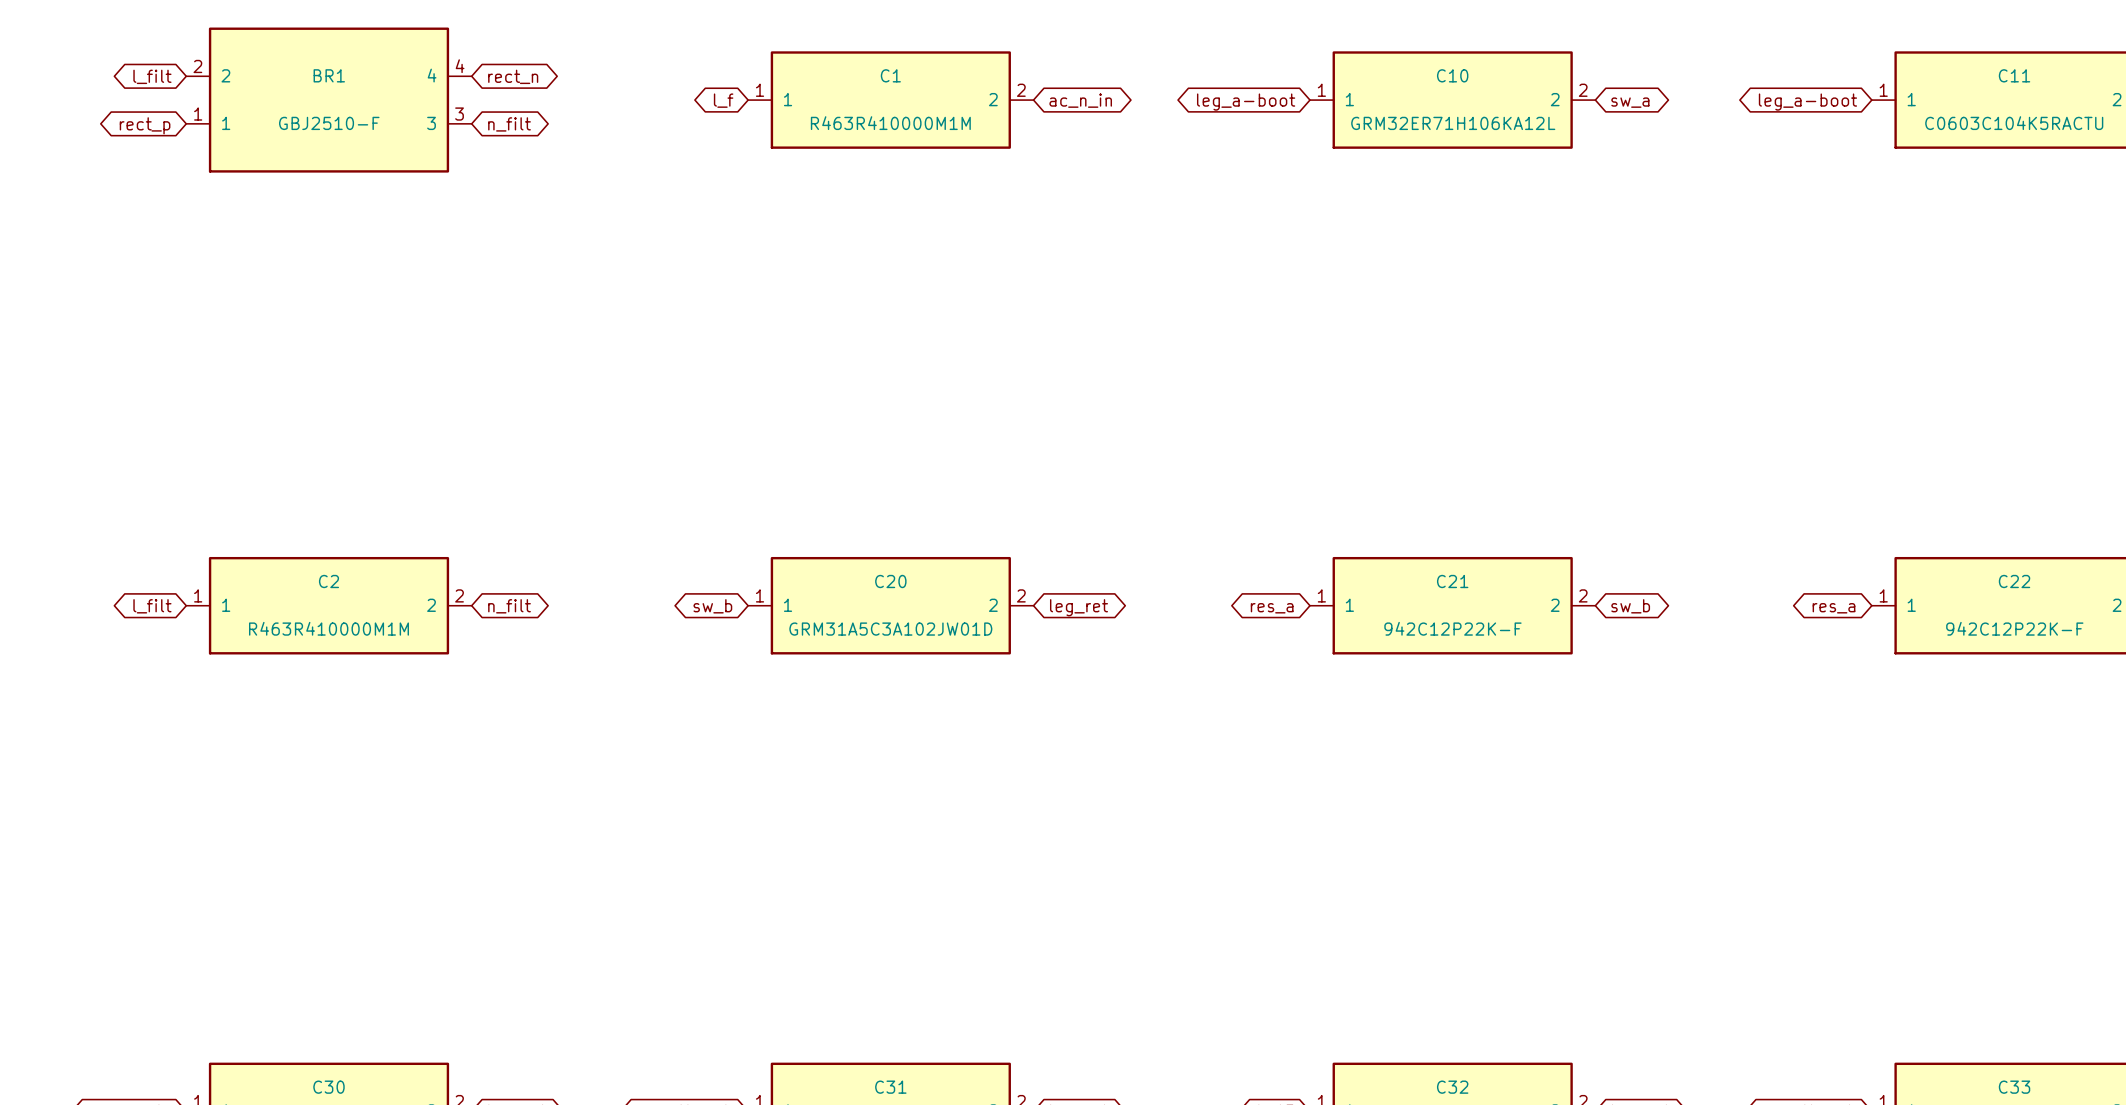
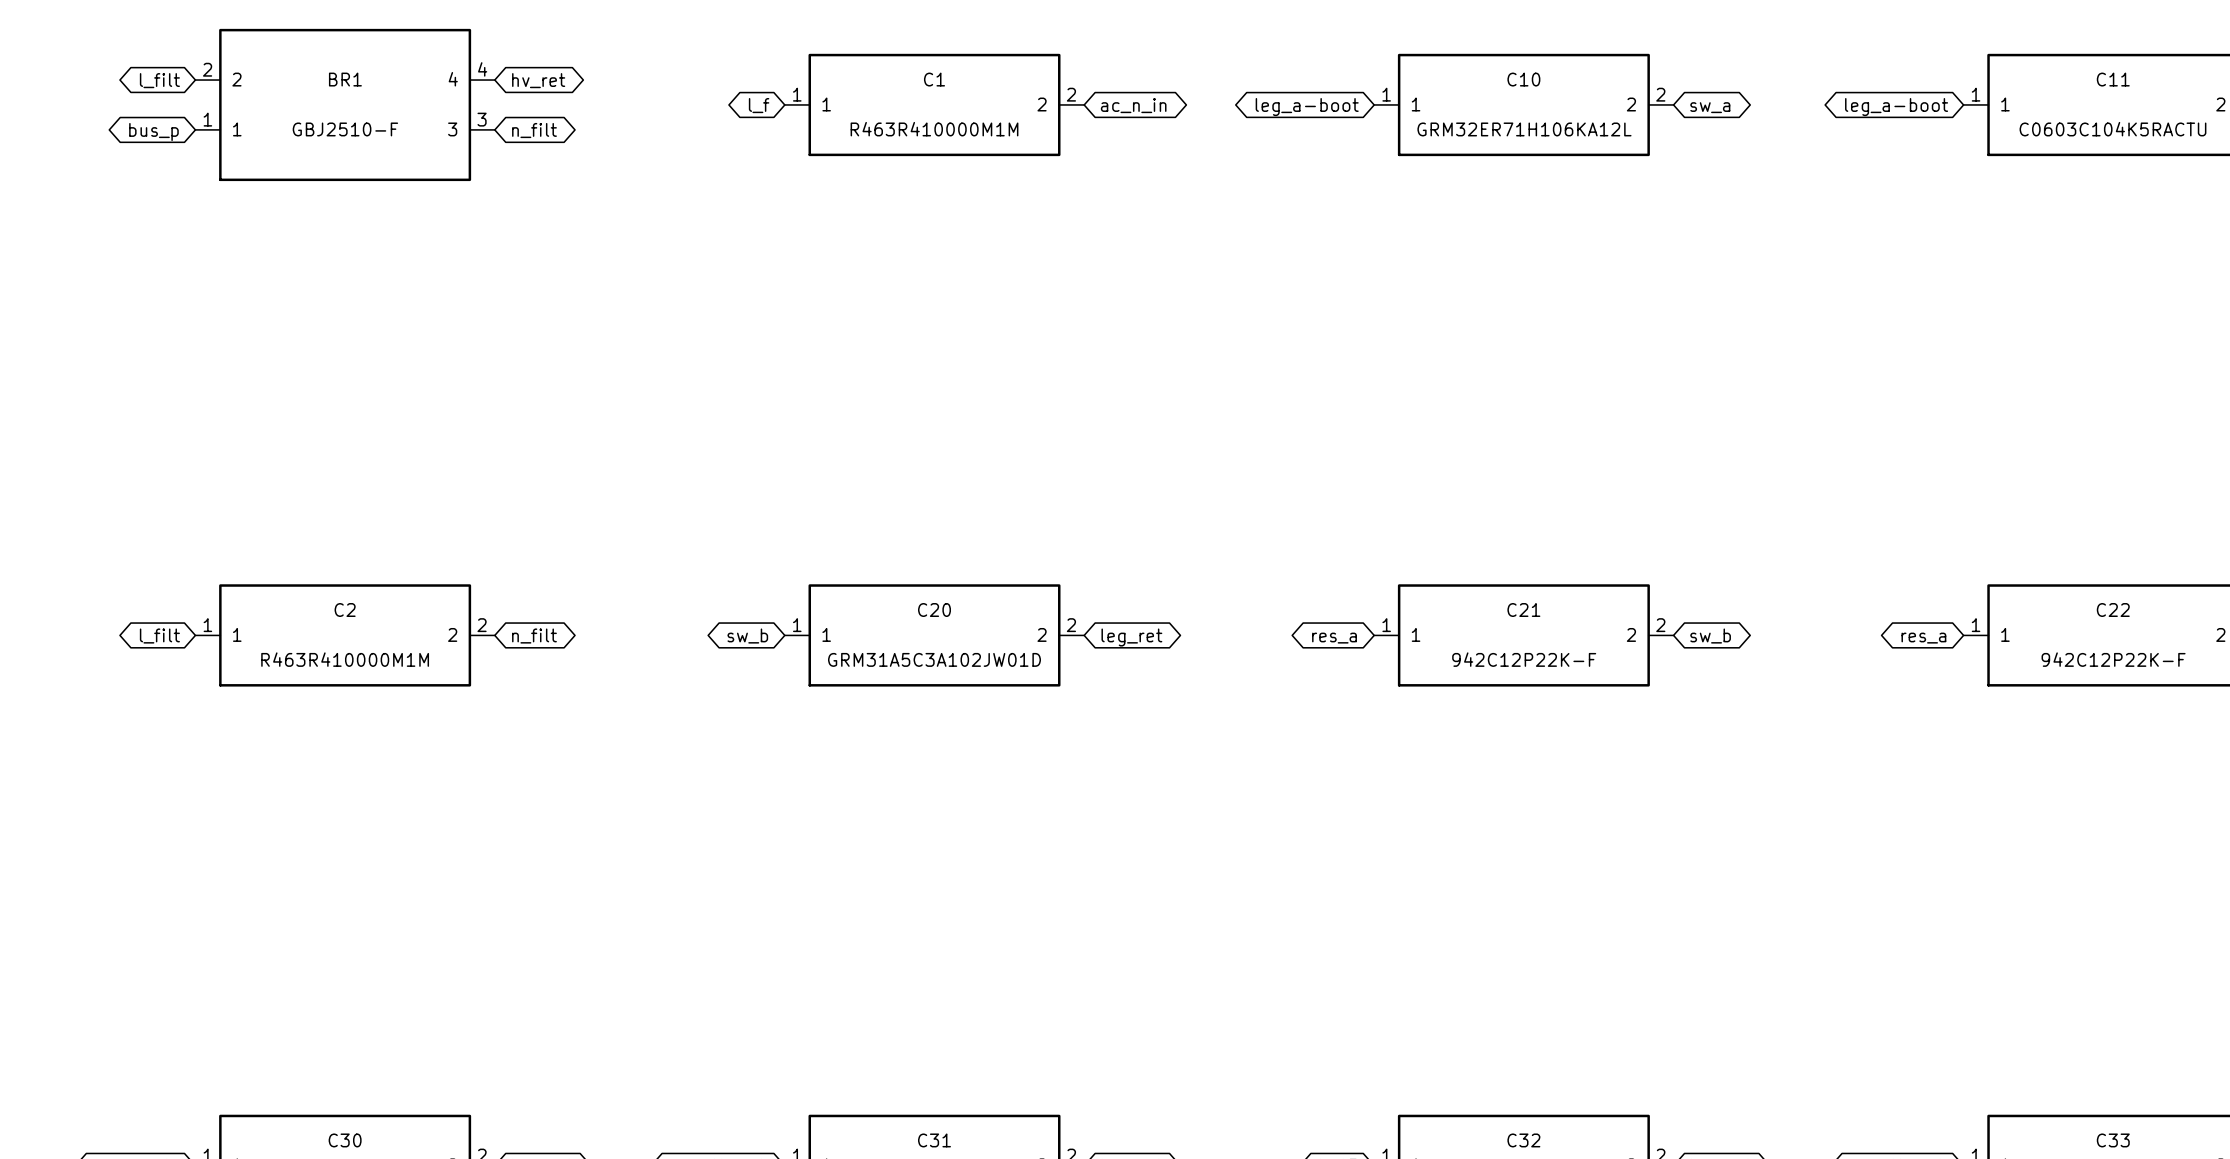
global label: rect_n (513, 76) -> hv_ret (538, 80)
global label: rect_p (145, 125) -> bus_p (153, 132)

